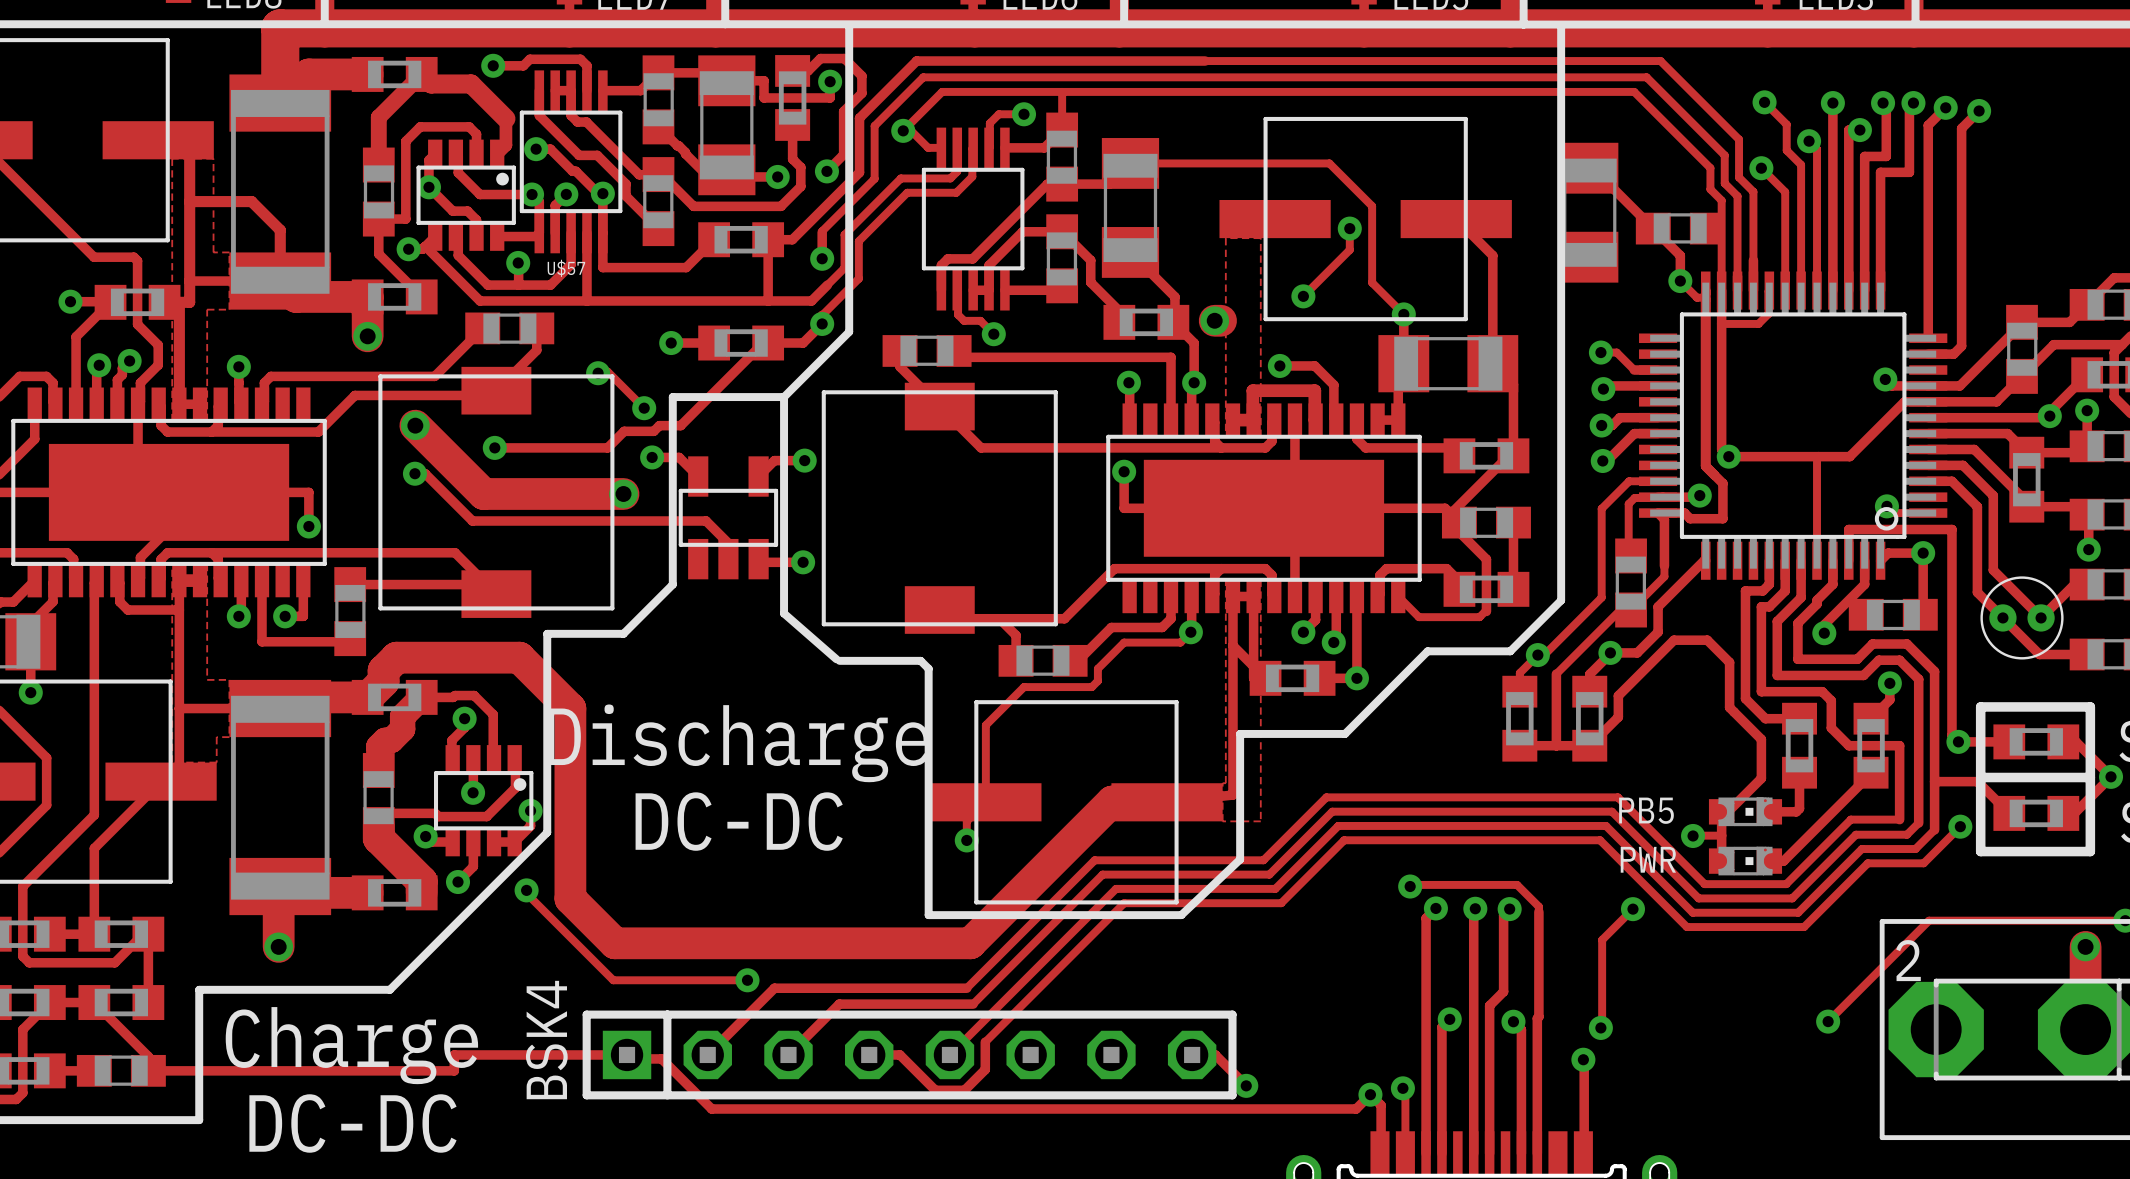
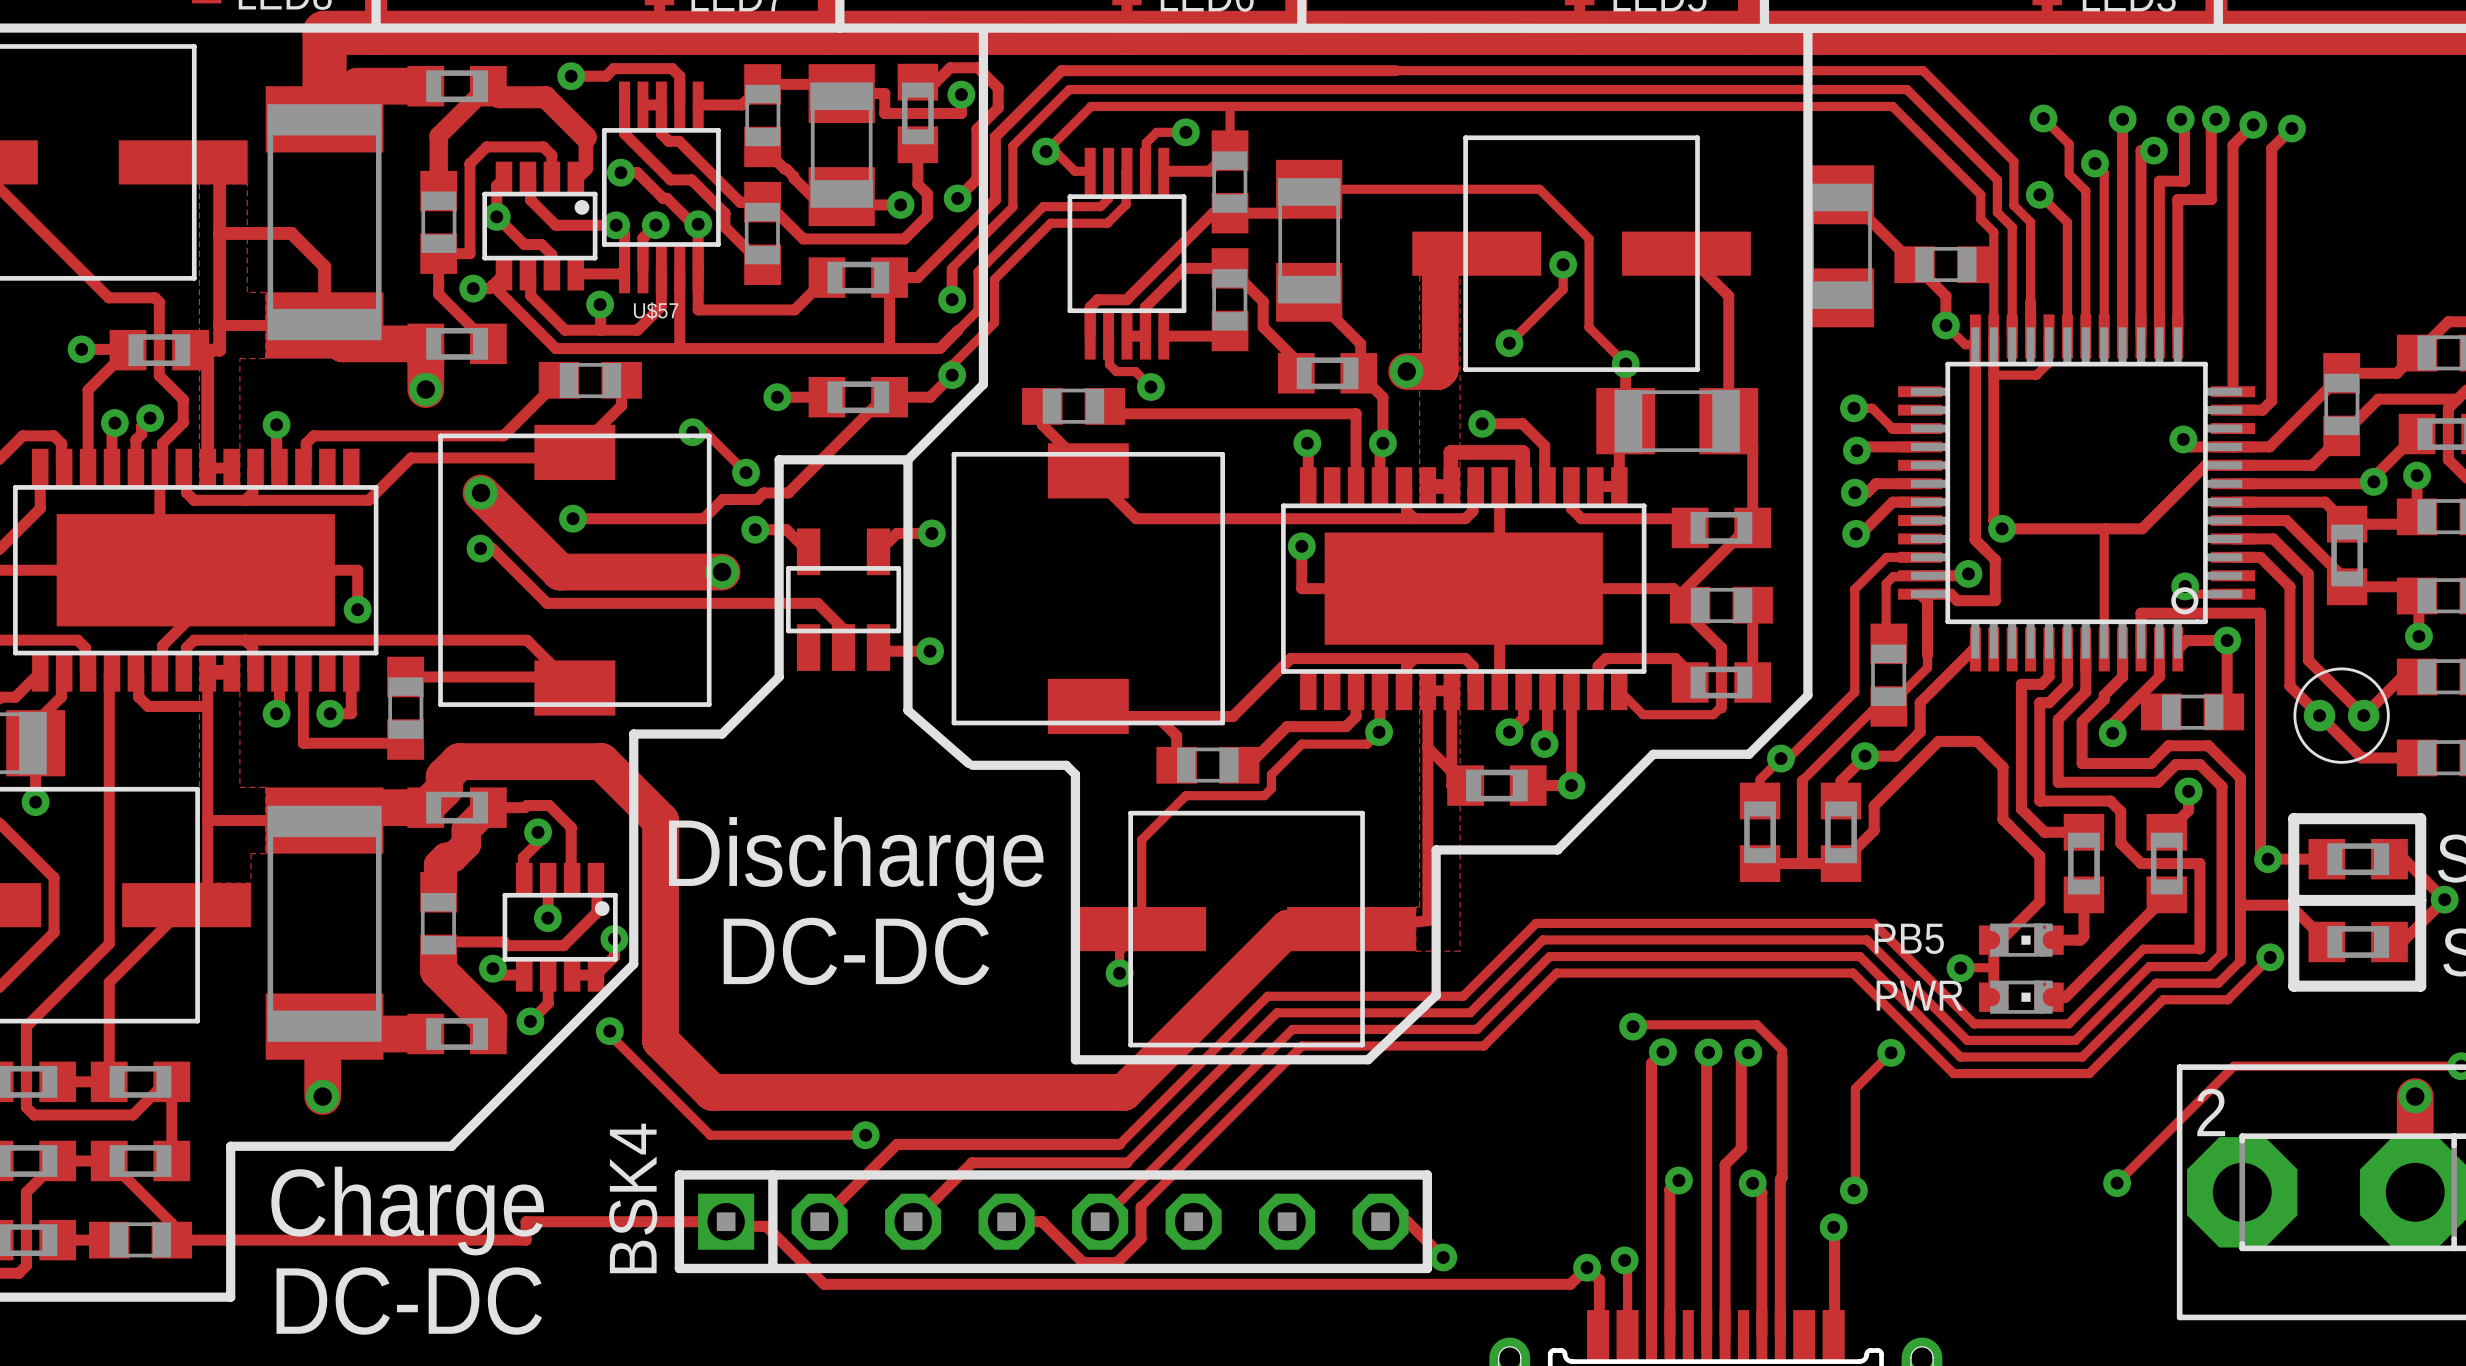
track: none -> (1450, 253) (1440, 253) (1440, 369) (1438, 371) (1414, 371)

